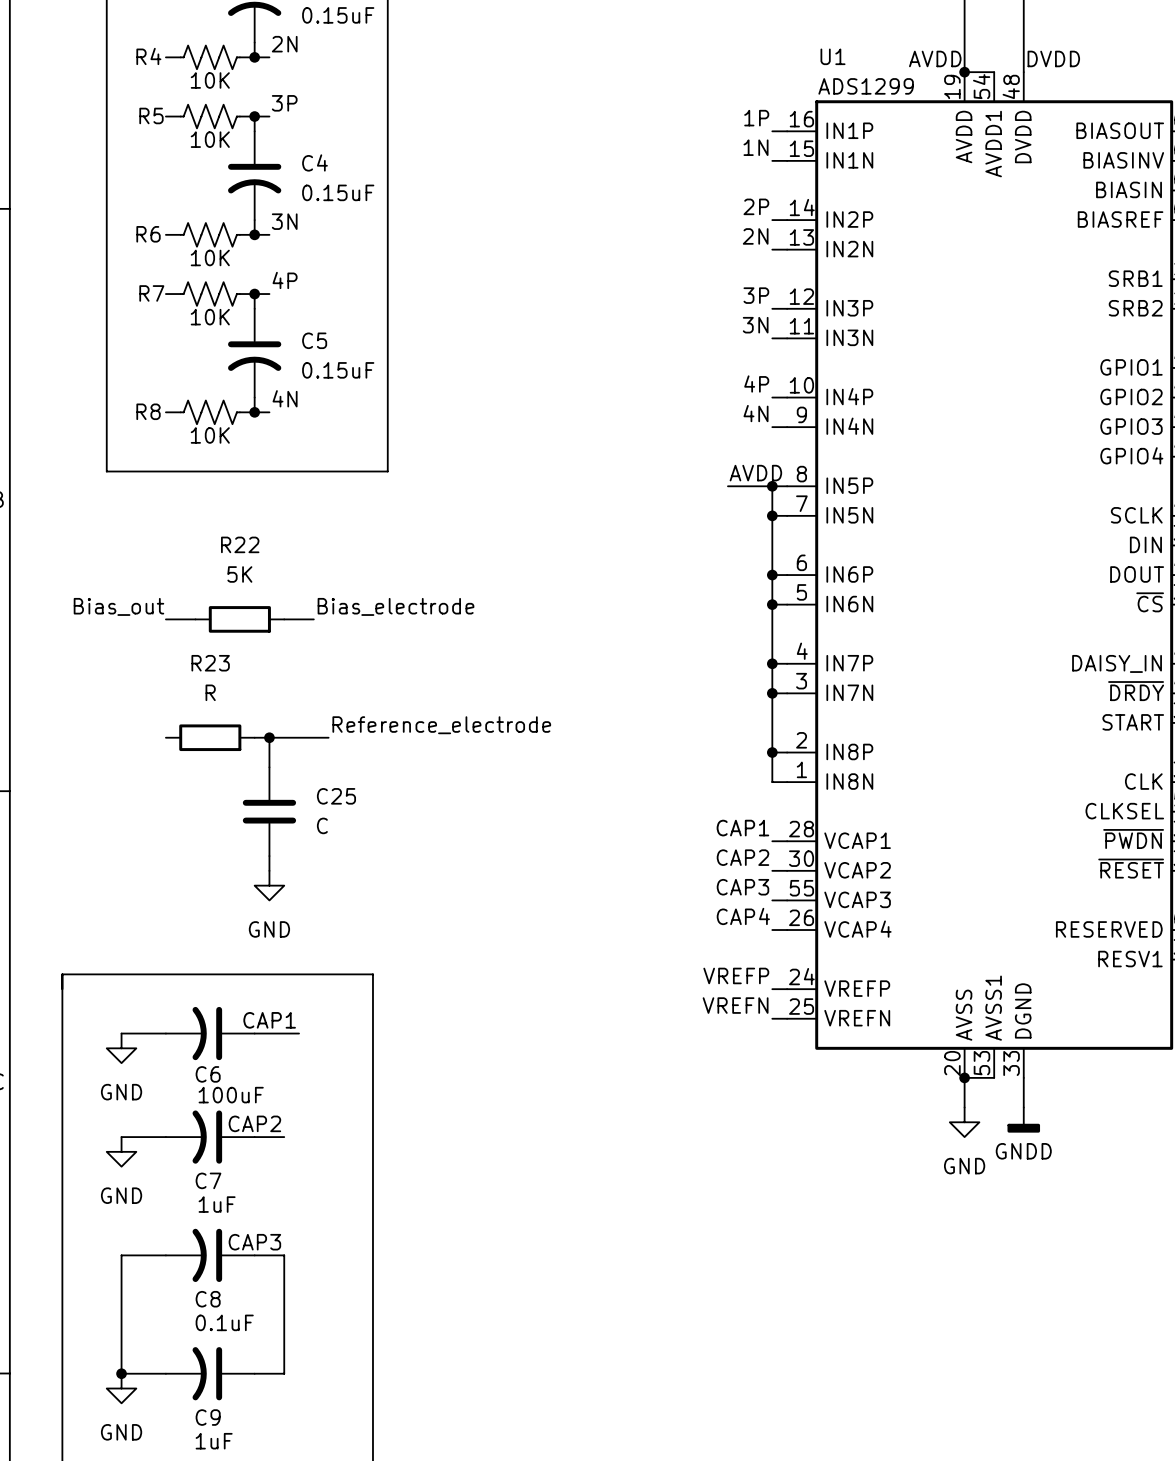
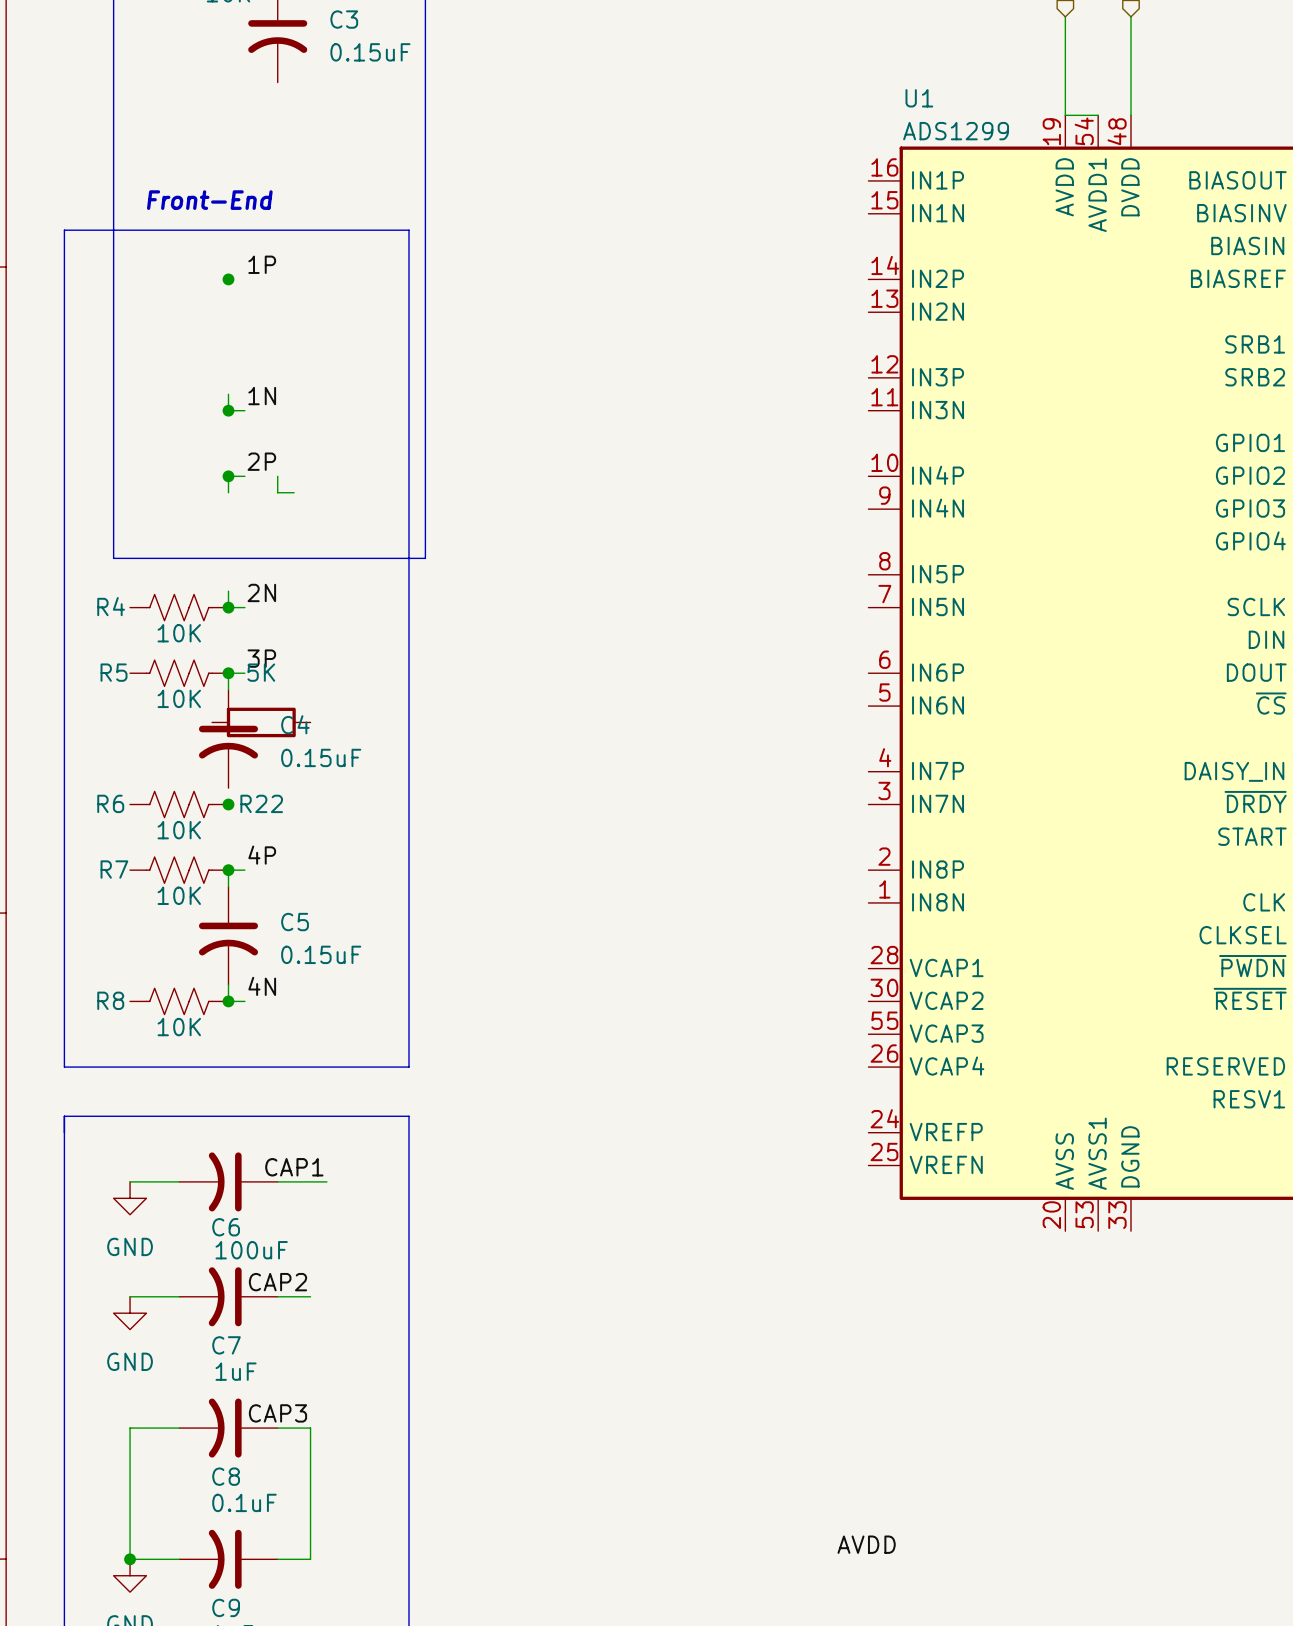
wire: (254, 42) (254, 57) (269, 57) -> (228, 394) (228, 410) (244, 410)
label: 2N (284, 44) -> none
R4 position: (210, 57) -> (179, 607)
junction: (254, 57) -> none
label: AVDD (935, 58) -> none
label: DVDD (1053, 58) -> none
junction: (964, 72) -> none
label: 3P (284, 103) -> none
R5 position: (210, 116) -> (179, 673)
junction: (254, 116) -> none
wire: (269, 116) (254, 116) (254, 131) -> (244, 476) (228, 476) (228, 492)
label: 1P (756, 118) -> none
wire: (772, 131) (787, 131) -> none
label: 1N (756, 147) -> none
text: none -> Front-End (209, 200)
wire: (772, 160) (787, 160) -> none
line: none -> (64, 230) (64, 1067) (408, 1067) (408, 230) (64, 230)
C4 position: (254, 175) -> (228, 738)
label: none -> 1P (262, 264)
label: 2P (756, 206) -> none
junction: none -> (228, 279)
wire: (254, 220) (254, 234) (269, 234) -> (228, 591) (228, 607) (244, 607)
wire: (772, 220) (787, 220) -> none
label: 3N (284, 221) -> none
R6 position: (210, 234) -> (179, 804)
junction: (254, 234) -> none
label: 2N (755, 236) -> none
wire: (772, 249) (787, 249) -> none
label: 4P (285, 280) -> none
R7 position: (210, 294) -> (179, 870)
junction: (254, 294) -> none
wire: (269, 294) (254, 294) (254, 308) -> (244, 673) (228, 673) (228, 689)
label: 3P (756, 295) -> none
wire: (772, 308) (787, 308) -> none
label: none -> 1N (262, 396)
label: 3N (755, 325) -> none
junction: none -> (228, 410)
wire: (772, 338) (787, 338) -> none
C5 position: (254, 353) -> (228, 935)
label: none -> 2P (261, 461)
label: 4P (756, 384) -> none
junction: none -> (228, 476)
wire: (772, 397) (787, 397) -> none
label: 4N (285, 398) -> none
R8 position: (210, 412) -> (179, 1001)
junction: (254, 412) -> none
label: 4N (756, 413) -> none
wire: (772, 427) (787, 427) -> none
label: AVDD (755, 473) -> none
wire: (727, 486) (787, 486) -> none
wire: (772, 486) (772, 782) (787, 782) -> none
junction: (772, 486) -> none
label: none -> 2N (261, 592)
junction: none -> (228, 607)
wire: (772, 515) (787, 515) -> none
junction: (772, 515) -> none
R22 name position: R22 (240, 544) -> R22 (261, 803)
label: none -> 3P (261, 658)
junction: none -> (228, 673)
wire: (772, 575) (787, 575) -> none
junction: (772, 575) -> none
wire: (772, 604) (787, 604) -> none
junction: (772, 604) -> none
label: Bias_out (118, 606) -> none
label: Bias_electrode (395, 606) -> none
wire: (165, 619) (195, 619) -> none
wire: (284, 619) (313, 619) -> none
wire: (772, 663) (787, 663) -> none
junction: (772, 663) -> none
junction: none -> (228, 804)
wire: (772, 693) (787, 693) -> none
junction: (772, 693) -> none
label: Reference_electrode (441, 725) -> none
R23: R (210, 737) -> none
wire: (254, 737) (328, 737) -> none
wire: (269, 737) (269, 767) -> none
junction: (269, 737) -> none
label: none -> 4P (262, 855)
junction: none -> (228, 870)
wire: none -> (244, 870) (228, 870) (228, 886)
wire: (772, 752) (787, 752) -> none
junction: (772, 752) -> none
C25: C (269, 811) -> none
label: CAP1 (742, 828) -> none
wire: (772, 841) (787, 841) -> none
wire: none -> (228, 985) (228, 1001) (244, 1001)
wire: (269, 856) (269, 870) -> none
label: none -> 4N (262, 986)
label: CAP2 (742, 857) -> none
junction: none -> (228, 1001)
wire: (772, 870) (787, 870) -> none
power symbol: GND (269, 885) -> none
label: CAP3 (742, 887) -> none
wire: (772, 900) (787, 900) -> none
label: CAP4 (743, 916) -> none
wire: (772, 930) (787, 930) -> none
label: VREFP (736, 975) -> none
wire: (772, 989) (787, 989) -> none
label: VREFN (735, 1005) -> none
wire: (772, 1018) (787, 1018) -> none
junction: (964, 1077) -> none
wire: (994, 1077) (964, 1077) (964, 1107) -> none
wire: (1023, 1077) (1023, 1107) -> none
power symbol: GNDD (1023, 1120) -> none
power symbol: GND (964, 1122) -> none
label: none -> AVDD (866, 1544)

